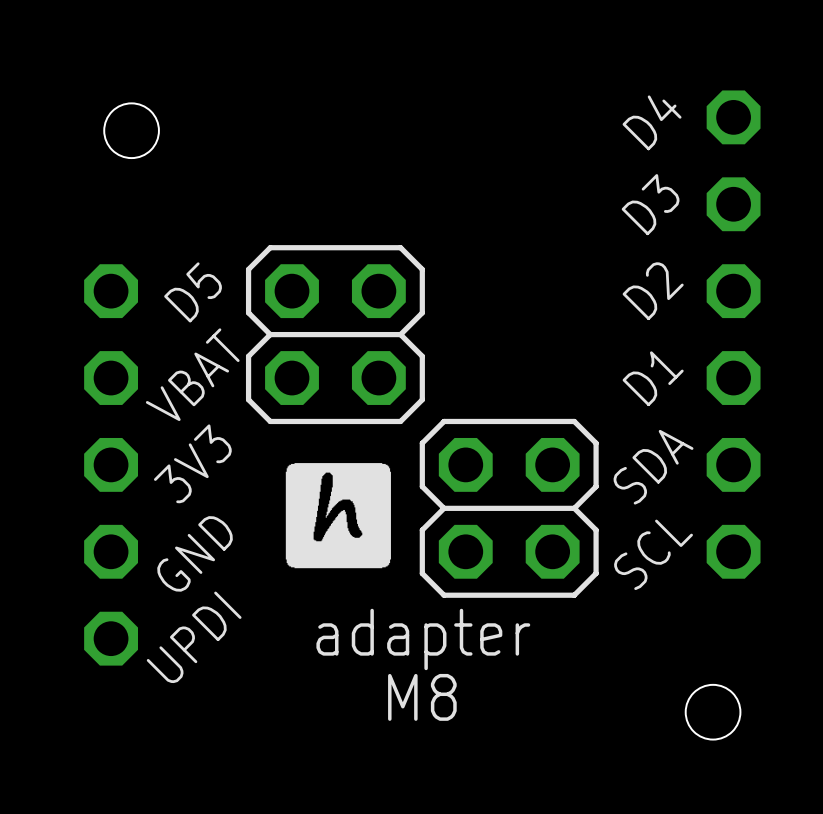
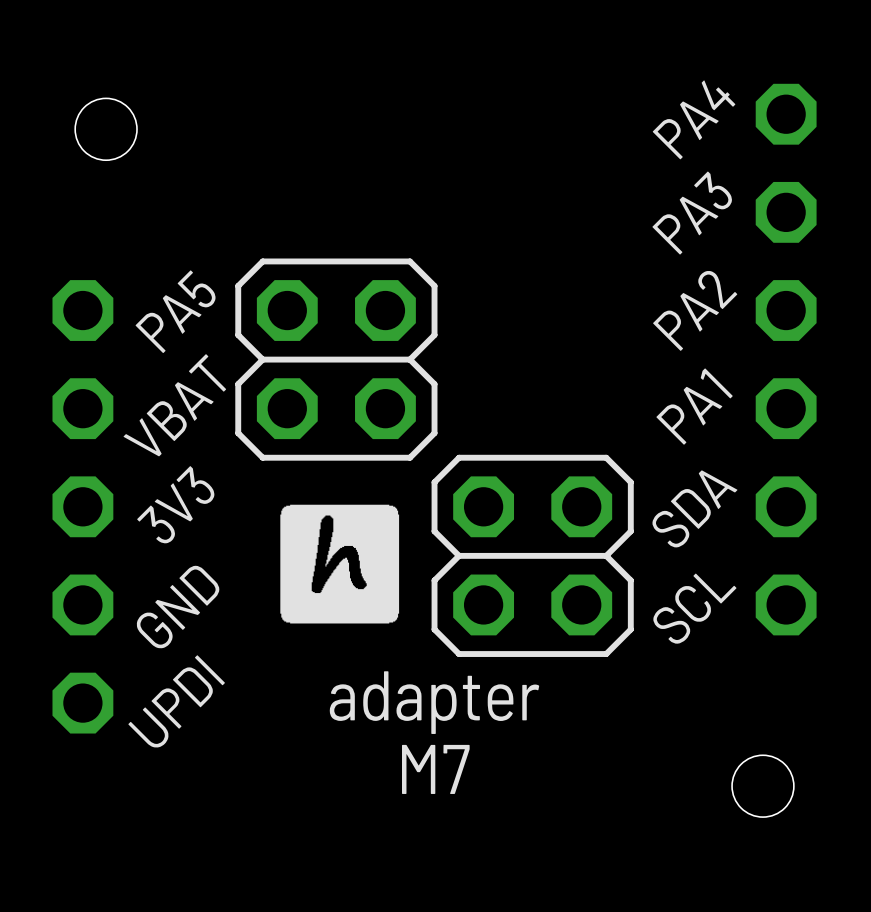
text: D4 (652, 122) -> PA4 (694, 119)
text: D3 (650, 204) -> PA3 (692, 213)
text: D2 (653, 291) -> PA2 (695, 310)
text: D5 (193, 292) -> PA5 (175, 311)
text: D1 (653, 378) -> PA1 (694, 406)
text: M8 (422, 697) -> M7 (435, 769)

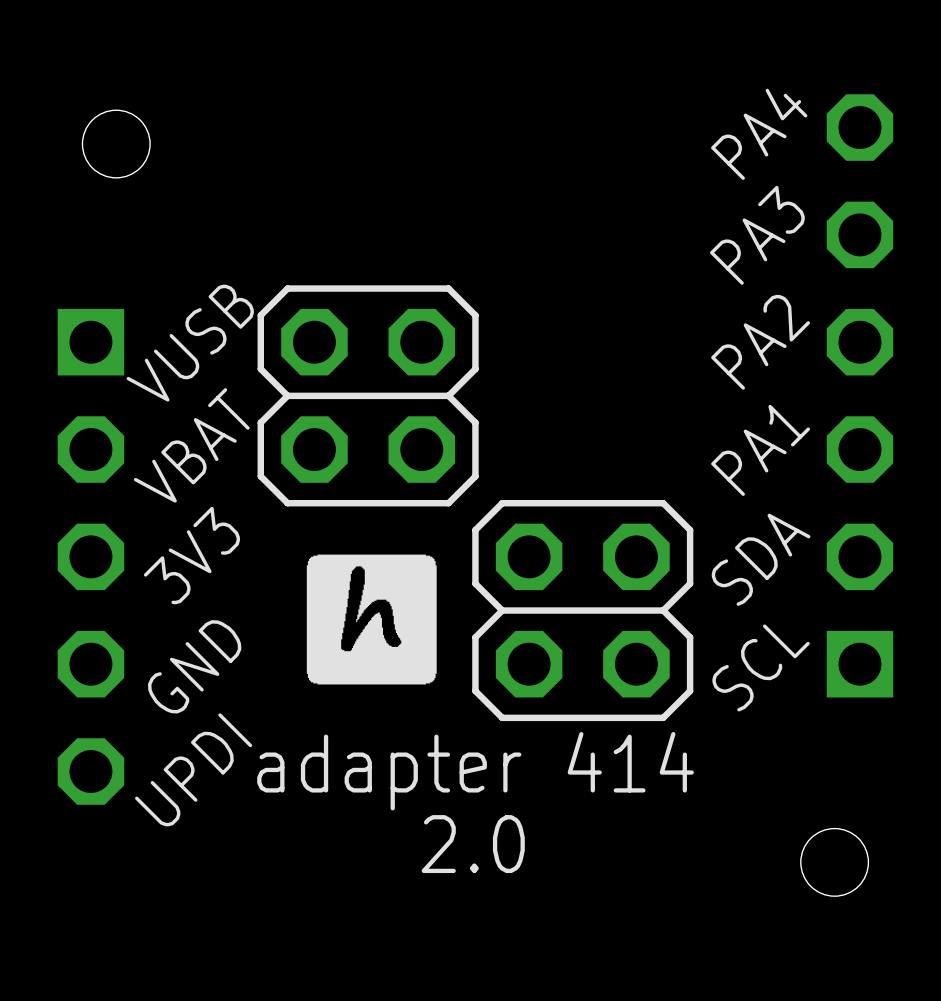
part footprint: [755, 83, 817, 636] -> [826, 94, 894, 698]
part footprint: [52, 280, 114, 734] -> [57, 308, 125, 805]
text: PA5 (175, 311) -> VUSB (190, 343)
text: adapter (434, 702) -> adapter 414 (475, 771)
text: M7 (435, 769) -> 2.0 (473, 844)

